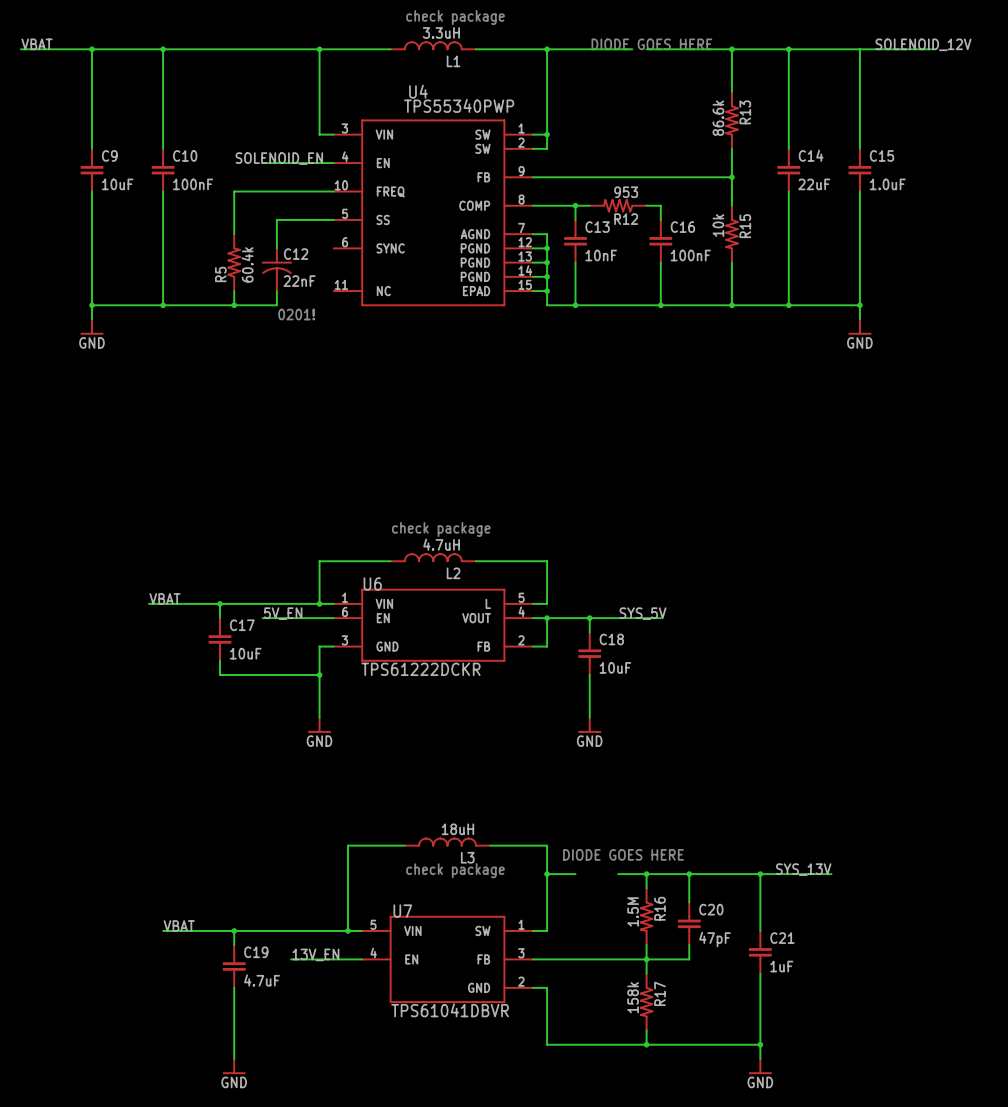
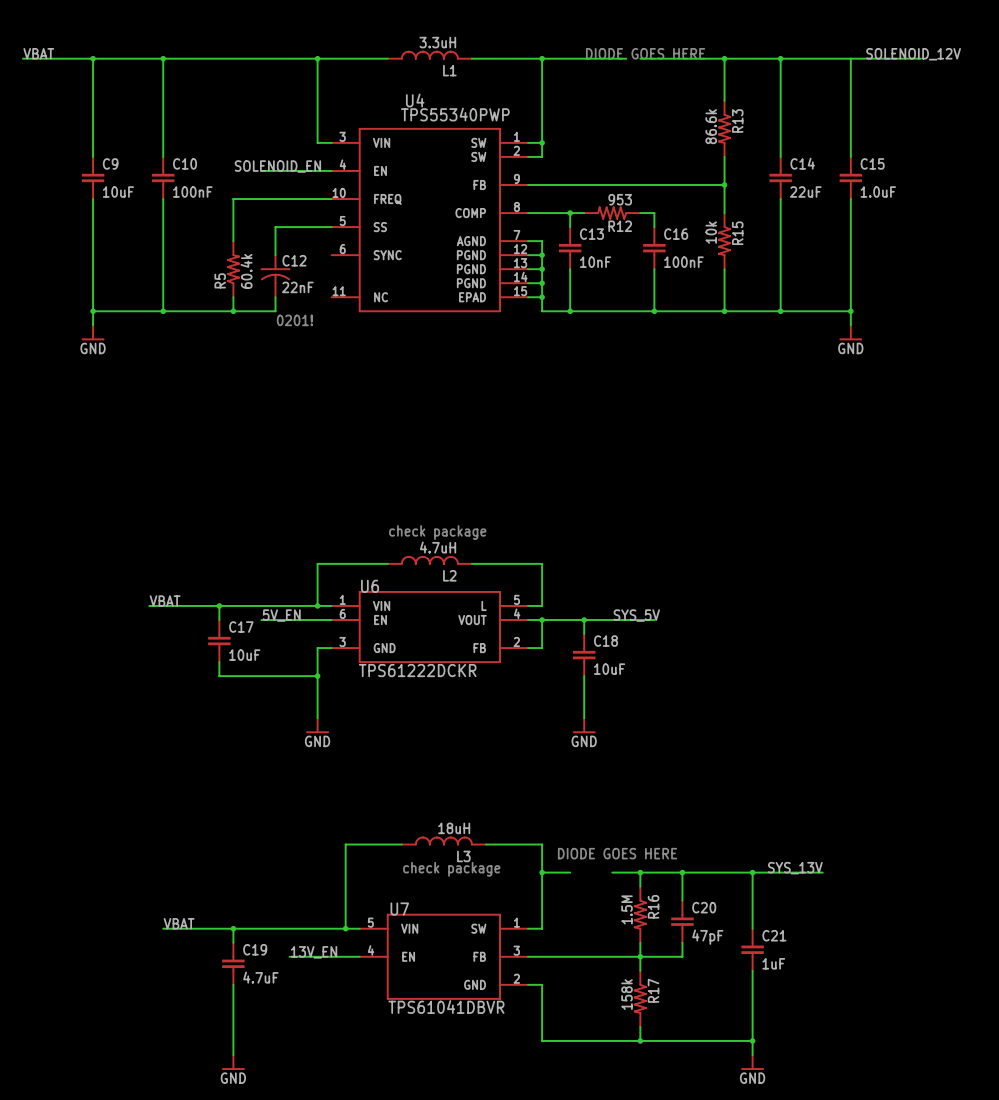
text: check package (455, 17) -> none

